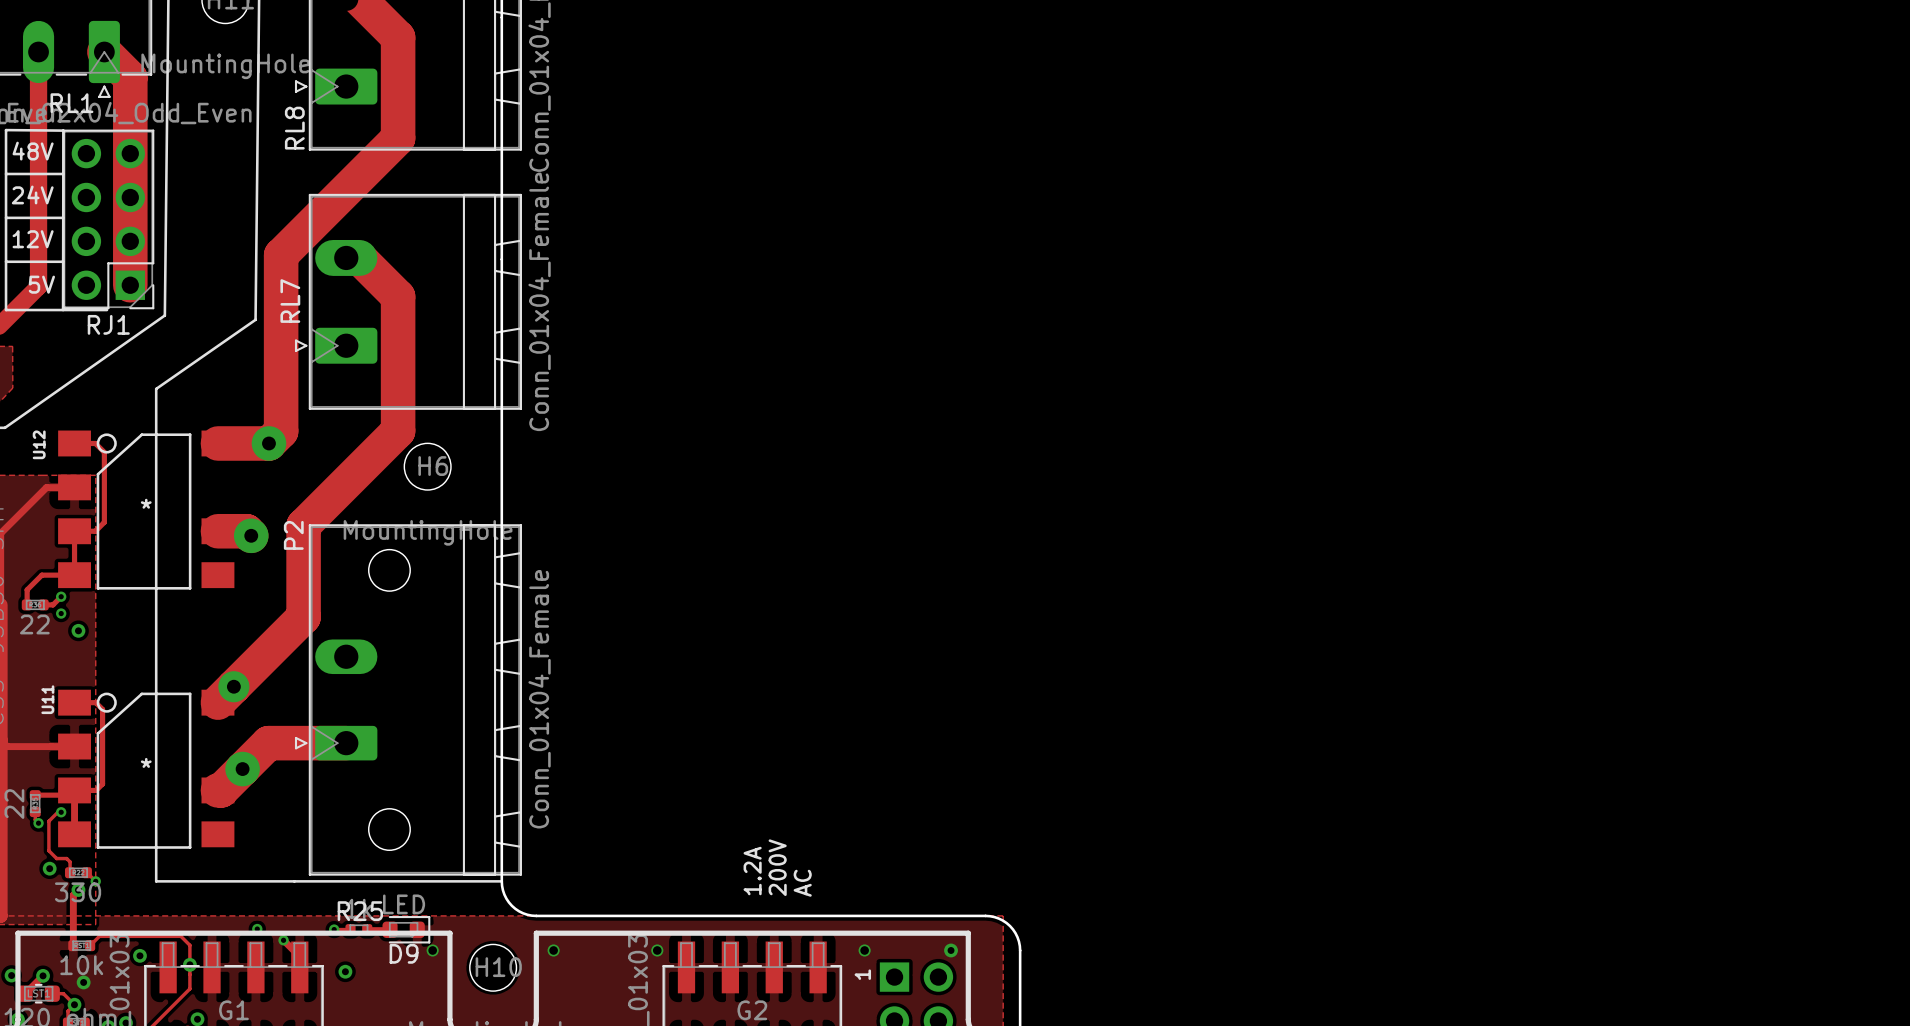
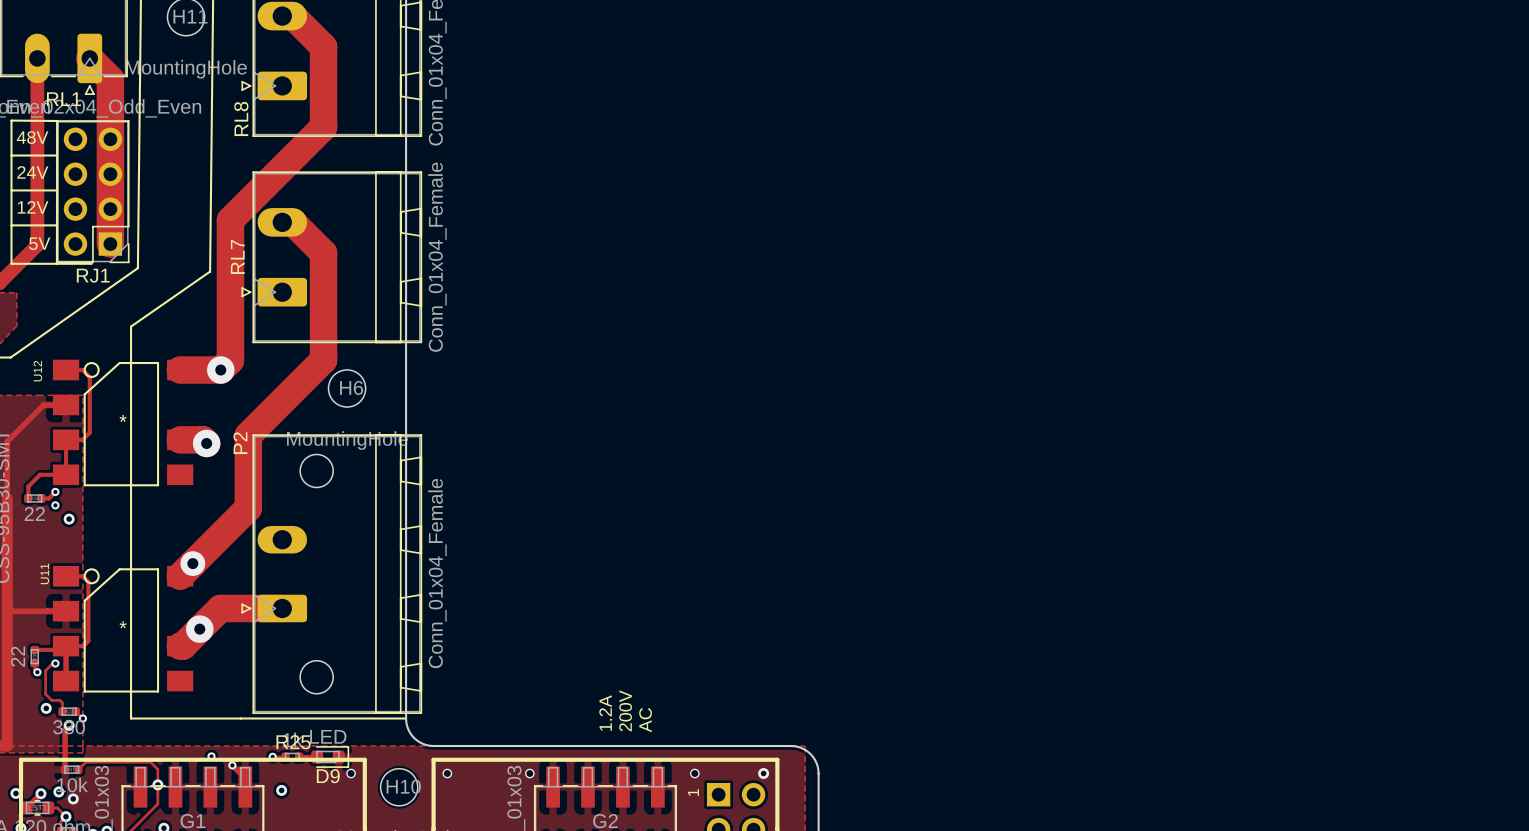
via: (139, 955) -> none
via: none -> (58, 791)

